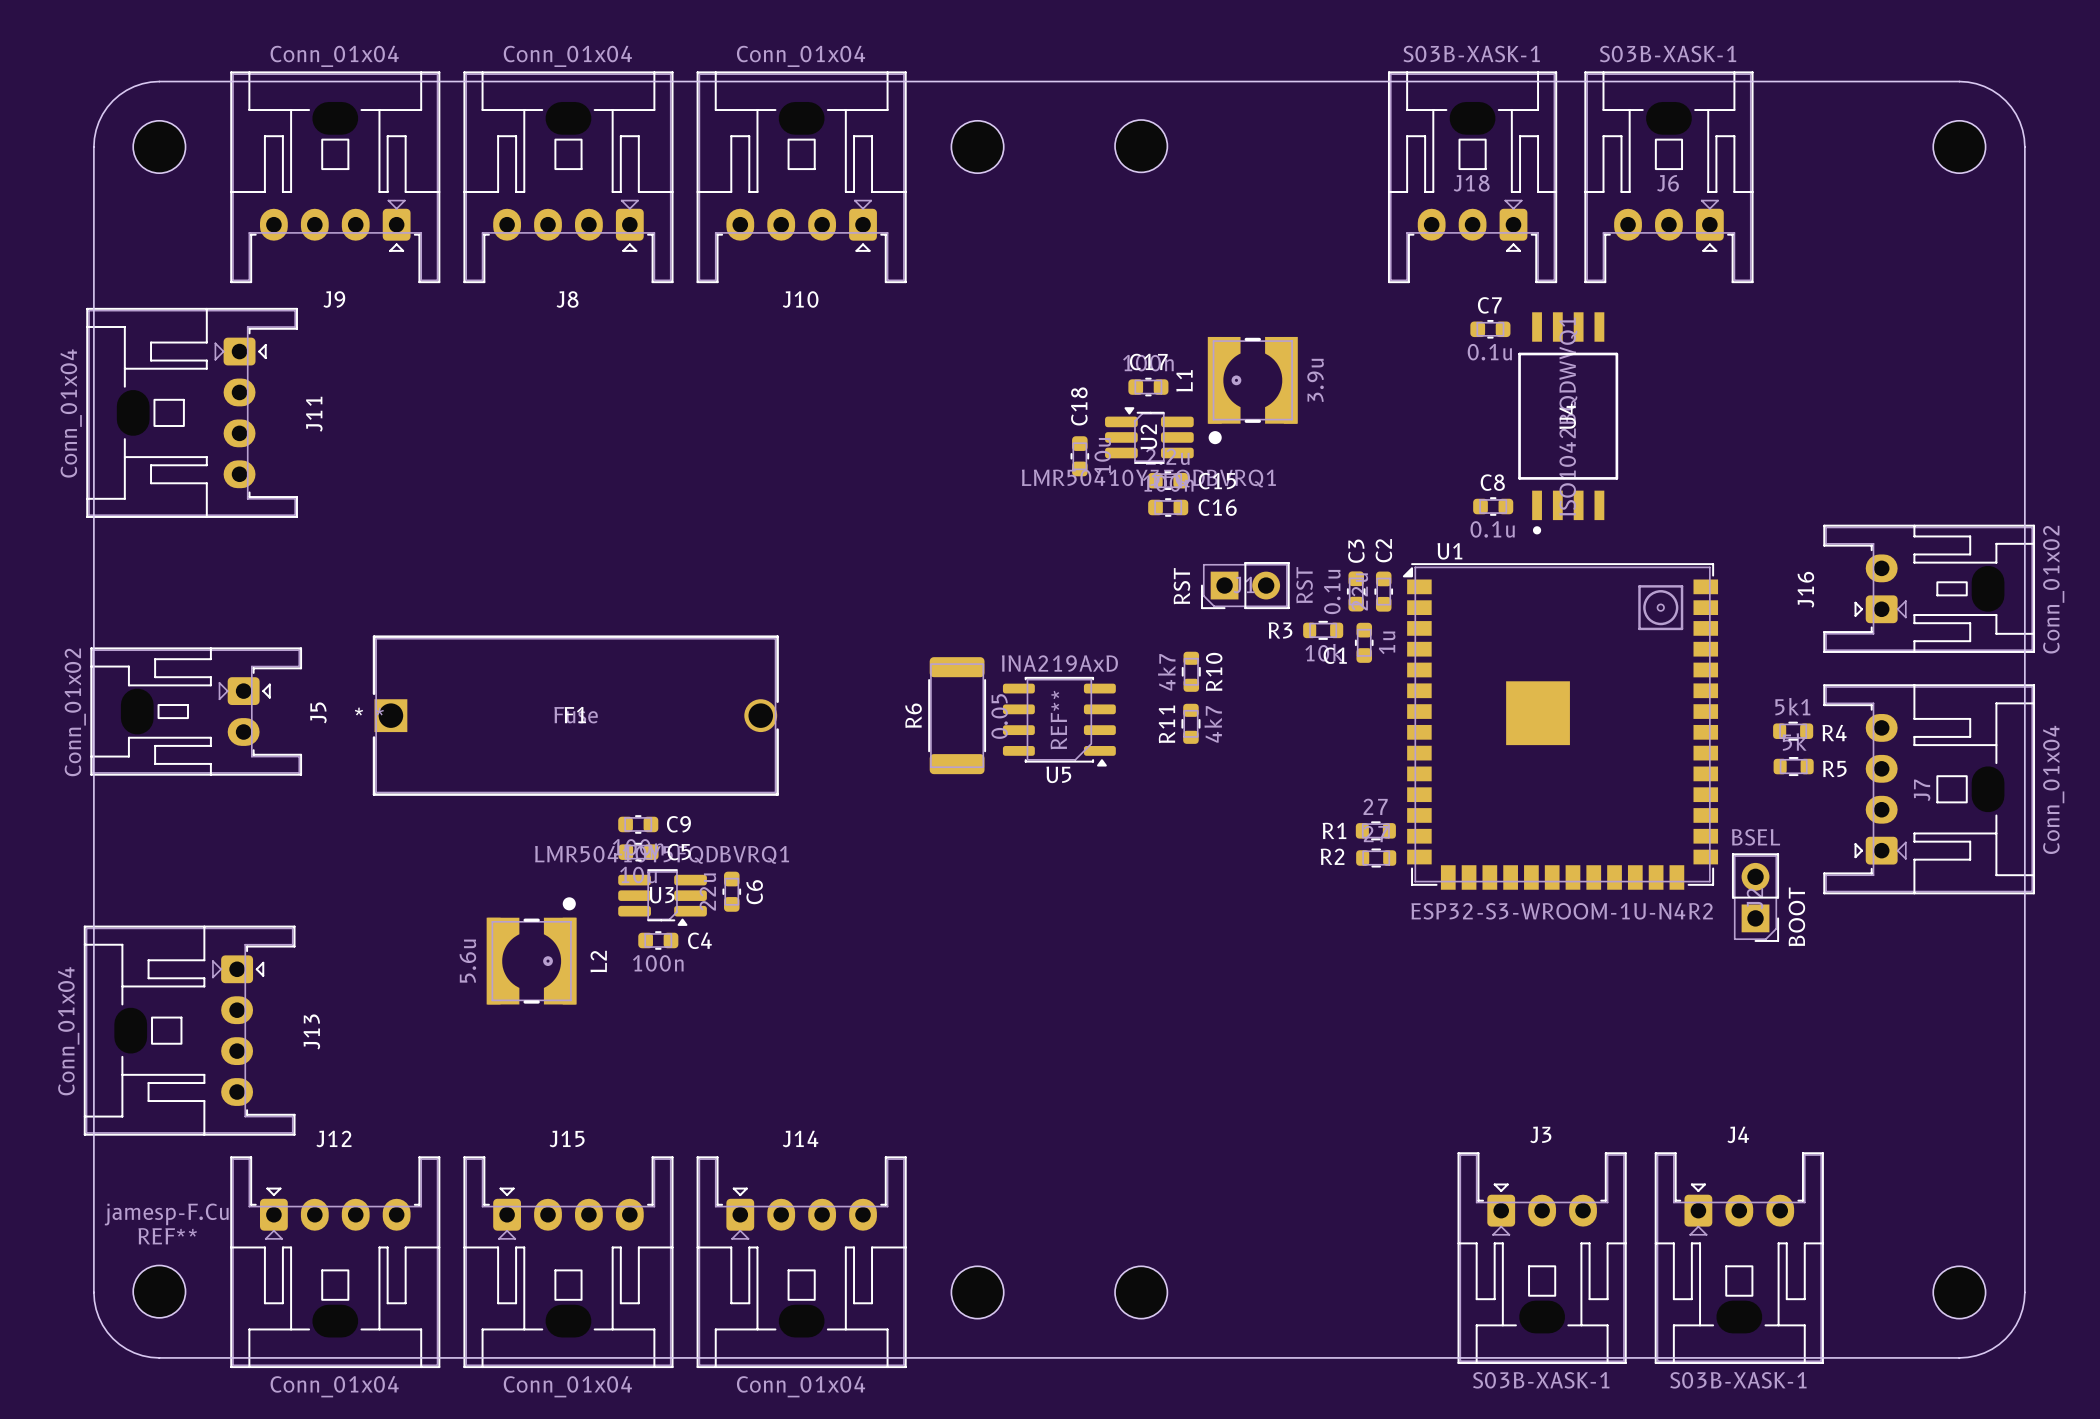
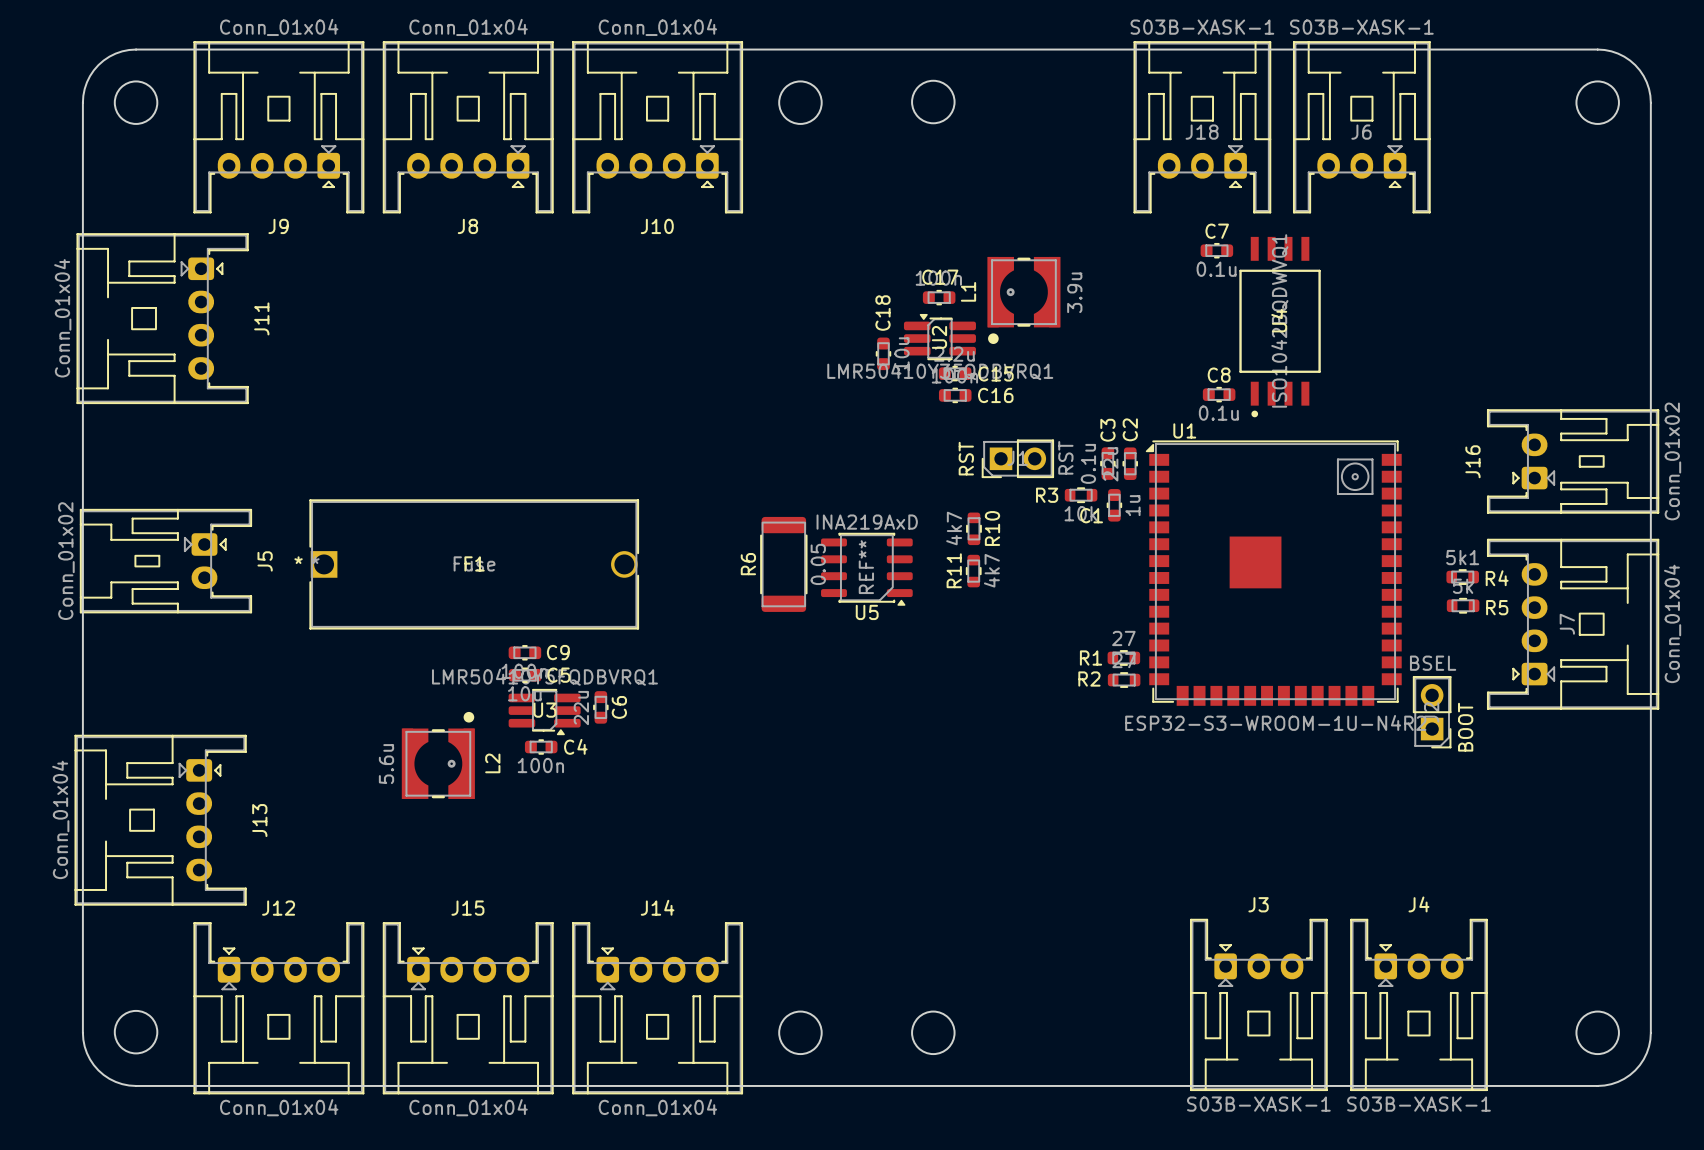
REF**: jamesp-F.Cu (166, 1223) -> none

